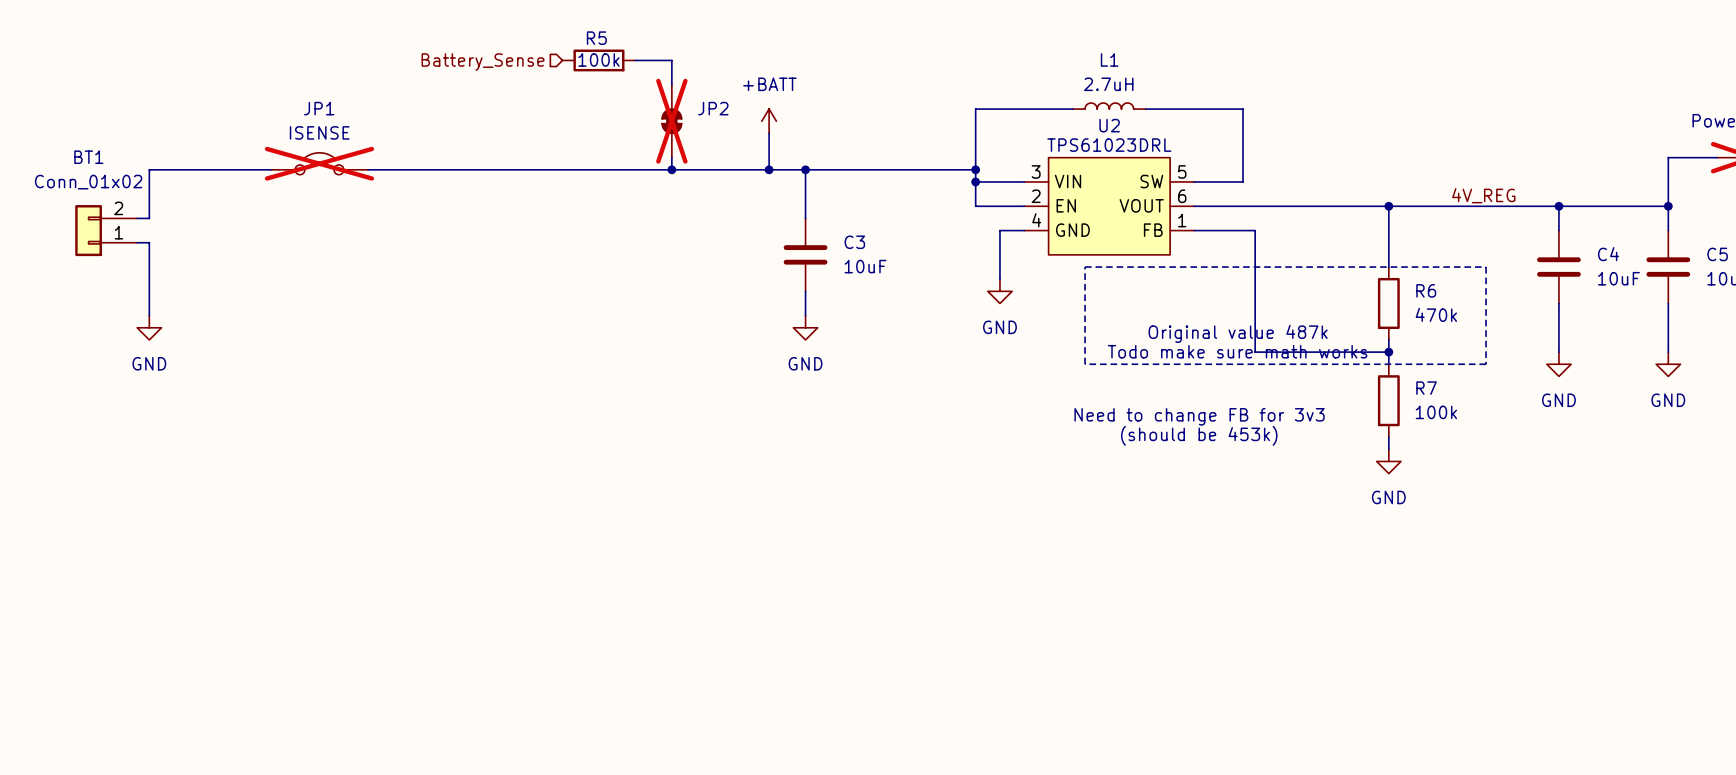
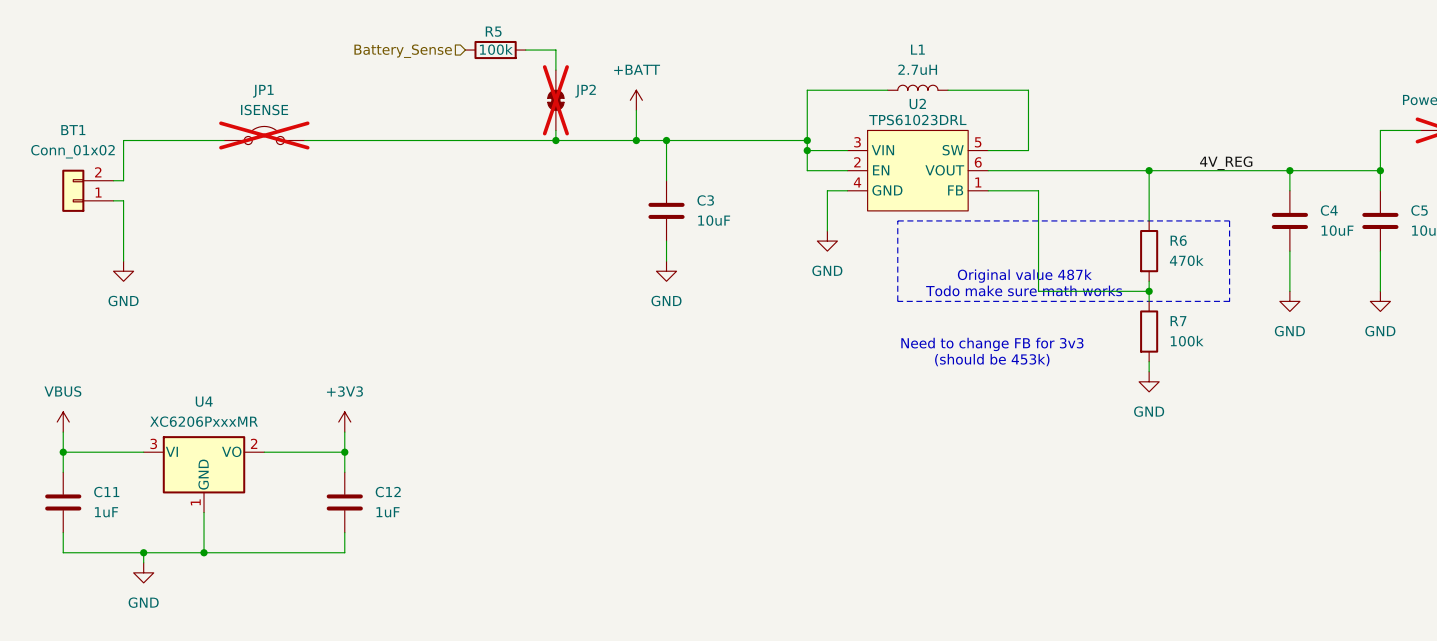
power symbol: none -> VBUS (63, 422)
power symbol: none -> +3V3 (344, 422)
wire: none -> (63, 432) (63, 472)
wire: none -> (344, 432) (344, 472)
wire: none -> (63, 452) (143, 452)
junction: none -> (63, 452)
wire: none -> (264, 452) (344, 452)
junction: none -> (344, 452)
U4: none -> XC6206PxxxMR (204, 474)
C11: none -> 1uF (63, 502)
C12: none -> 1uF (344, 502)
wire: none -> (204, 512) (204, 552)
wire: none -> (63, 532) (63, 552) (344, 552) (344, 532)
wire: none -> (143, 552) (143, 562)
junction: none -> (143, 552)
junction: none -> (204, 552)
power symbol: none -> GND (143, 572)

